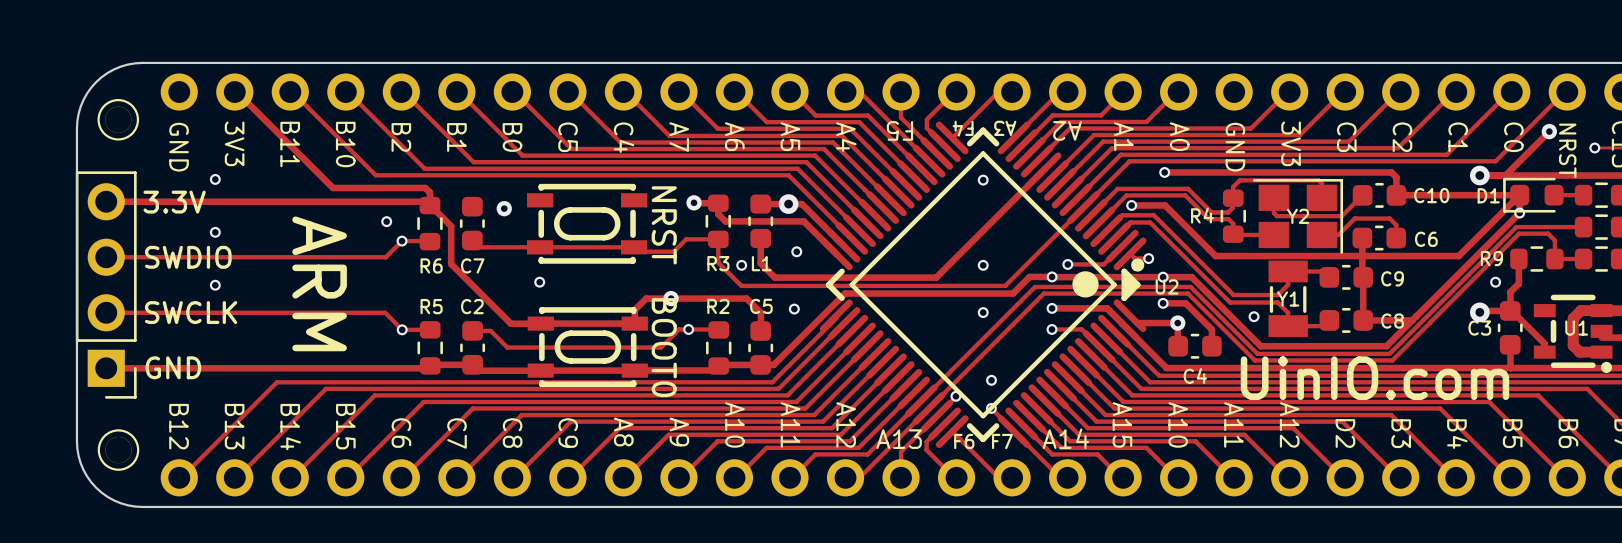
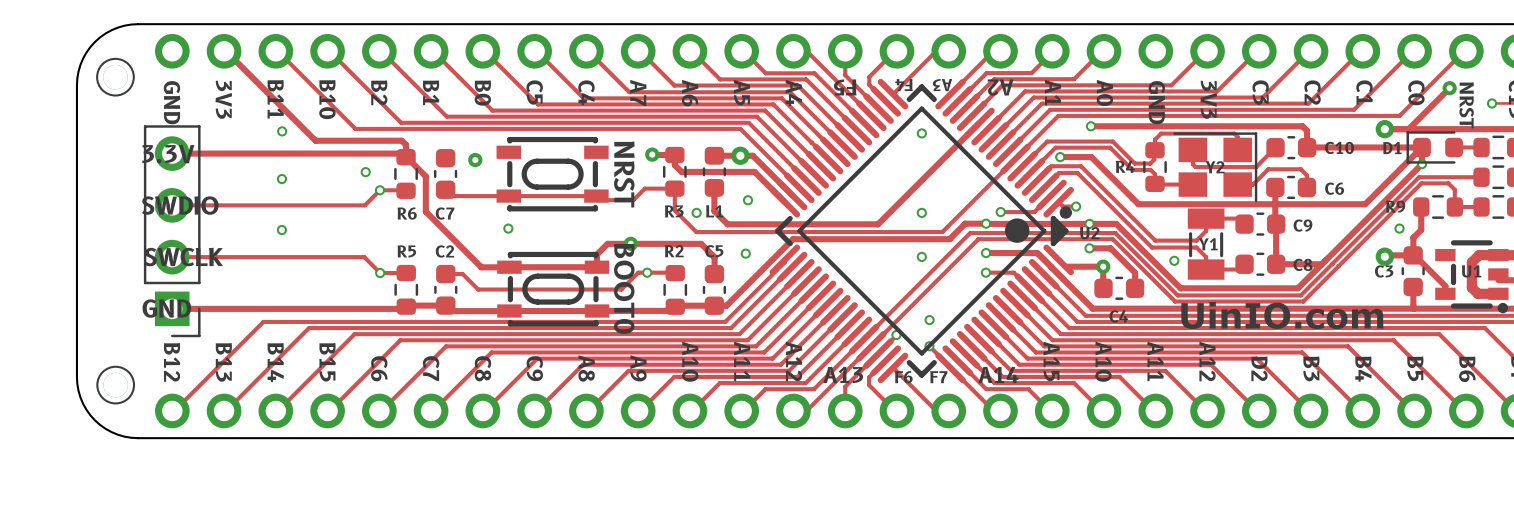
via: none -> (282, 131)
via: (215, 179) -> none
track: (106, 201) (179, 201) -> none
via: none -> (281, 179)
via: (215, 232) -> none
track: (106, 257) (179, 257) -> none
via: none -> (281, 230)
text: ARM (319, 283) -> none
part position: (106, 285) -> (172, 231)
via: (215, 285) -> none
track: (106, 312) (179, 312) -> none
drawing: none -> [1181, 301, 1384, 330]
track: (106, 368) (179, 368) -> none
text: UinIO.com (1374, 378) -> none

